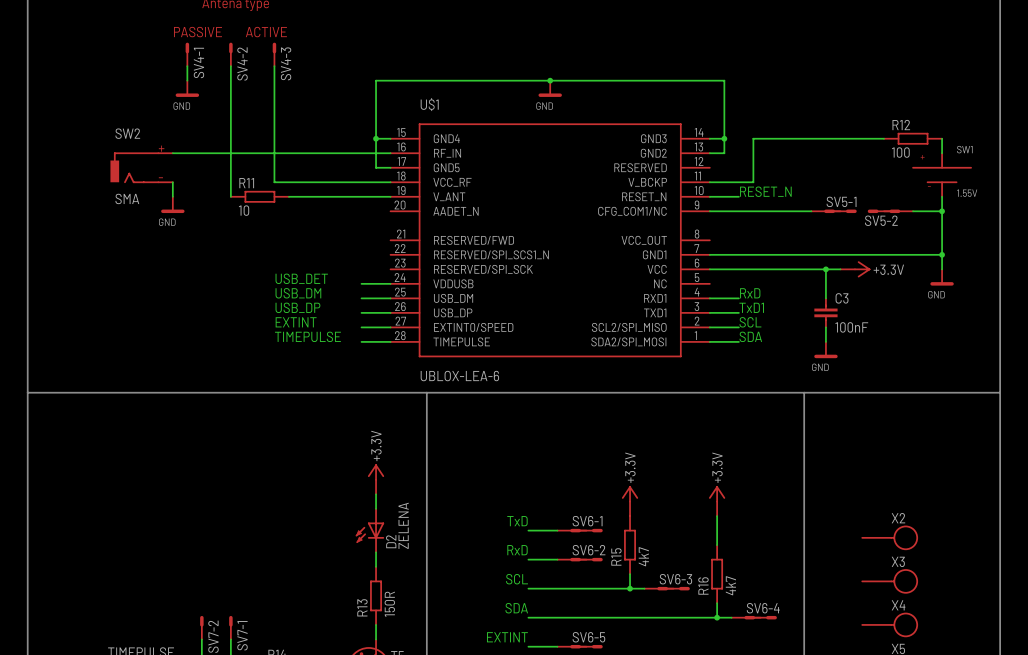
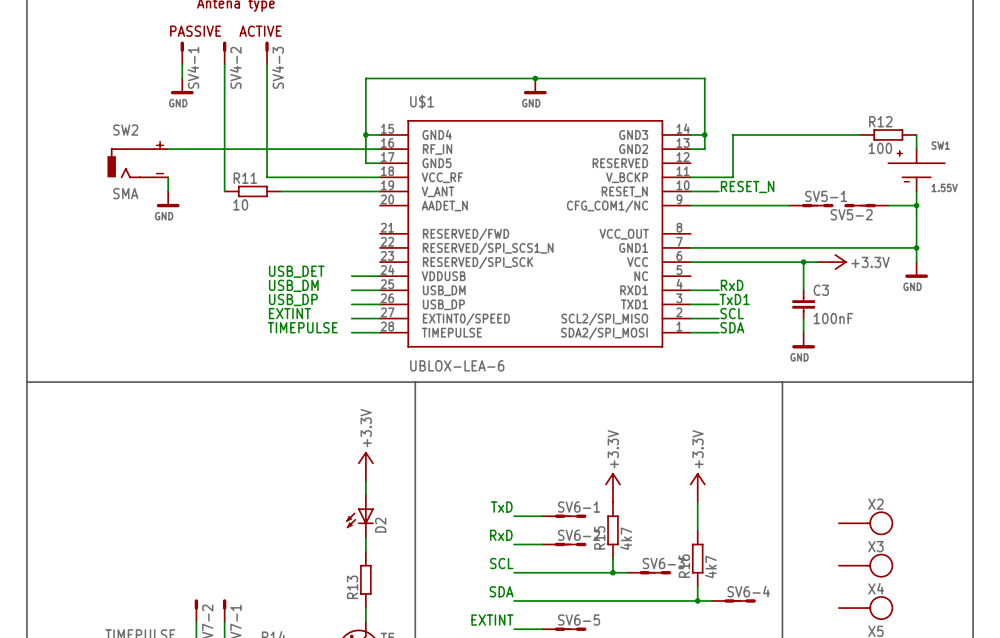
D2 value: ZELENA (403, 525) -> none
R13 value: 150R (389, 604) -> none

